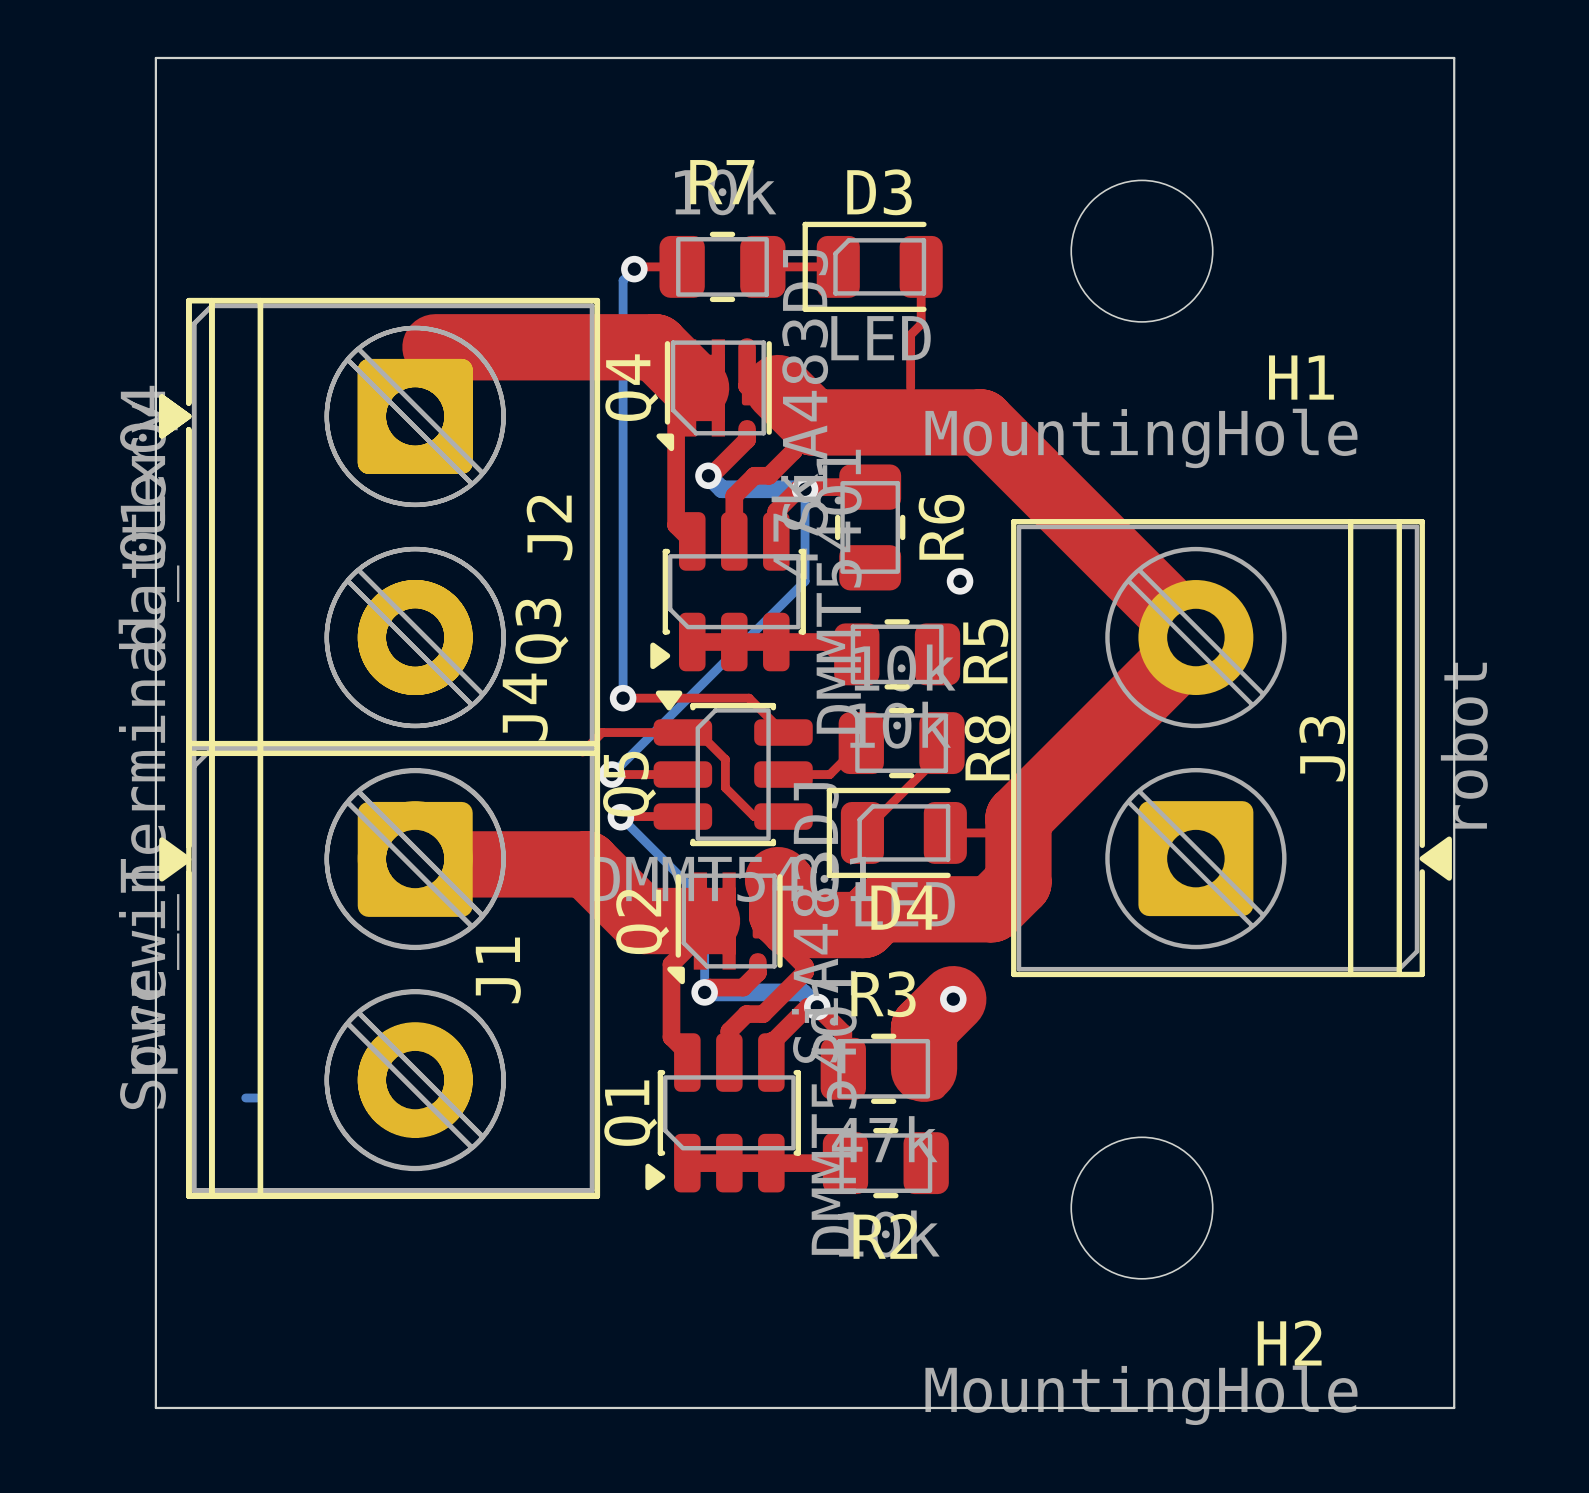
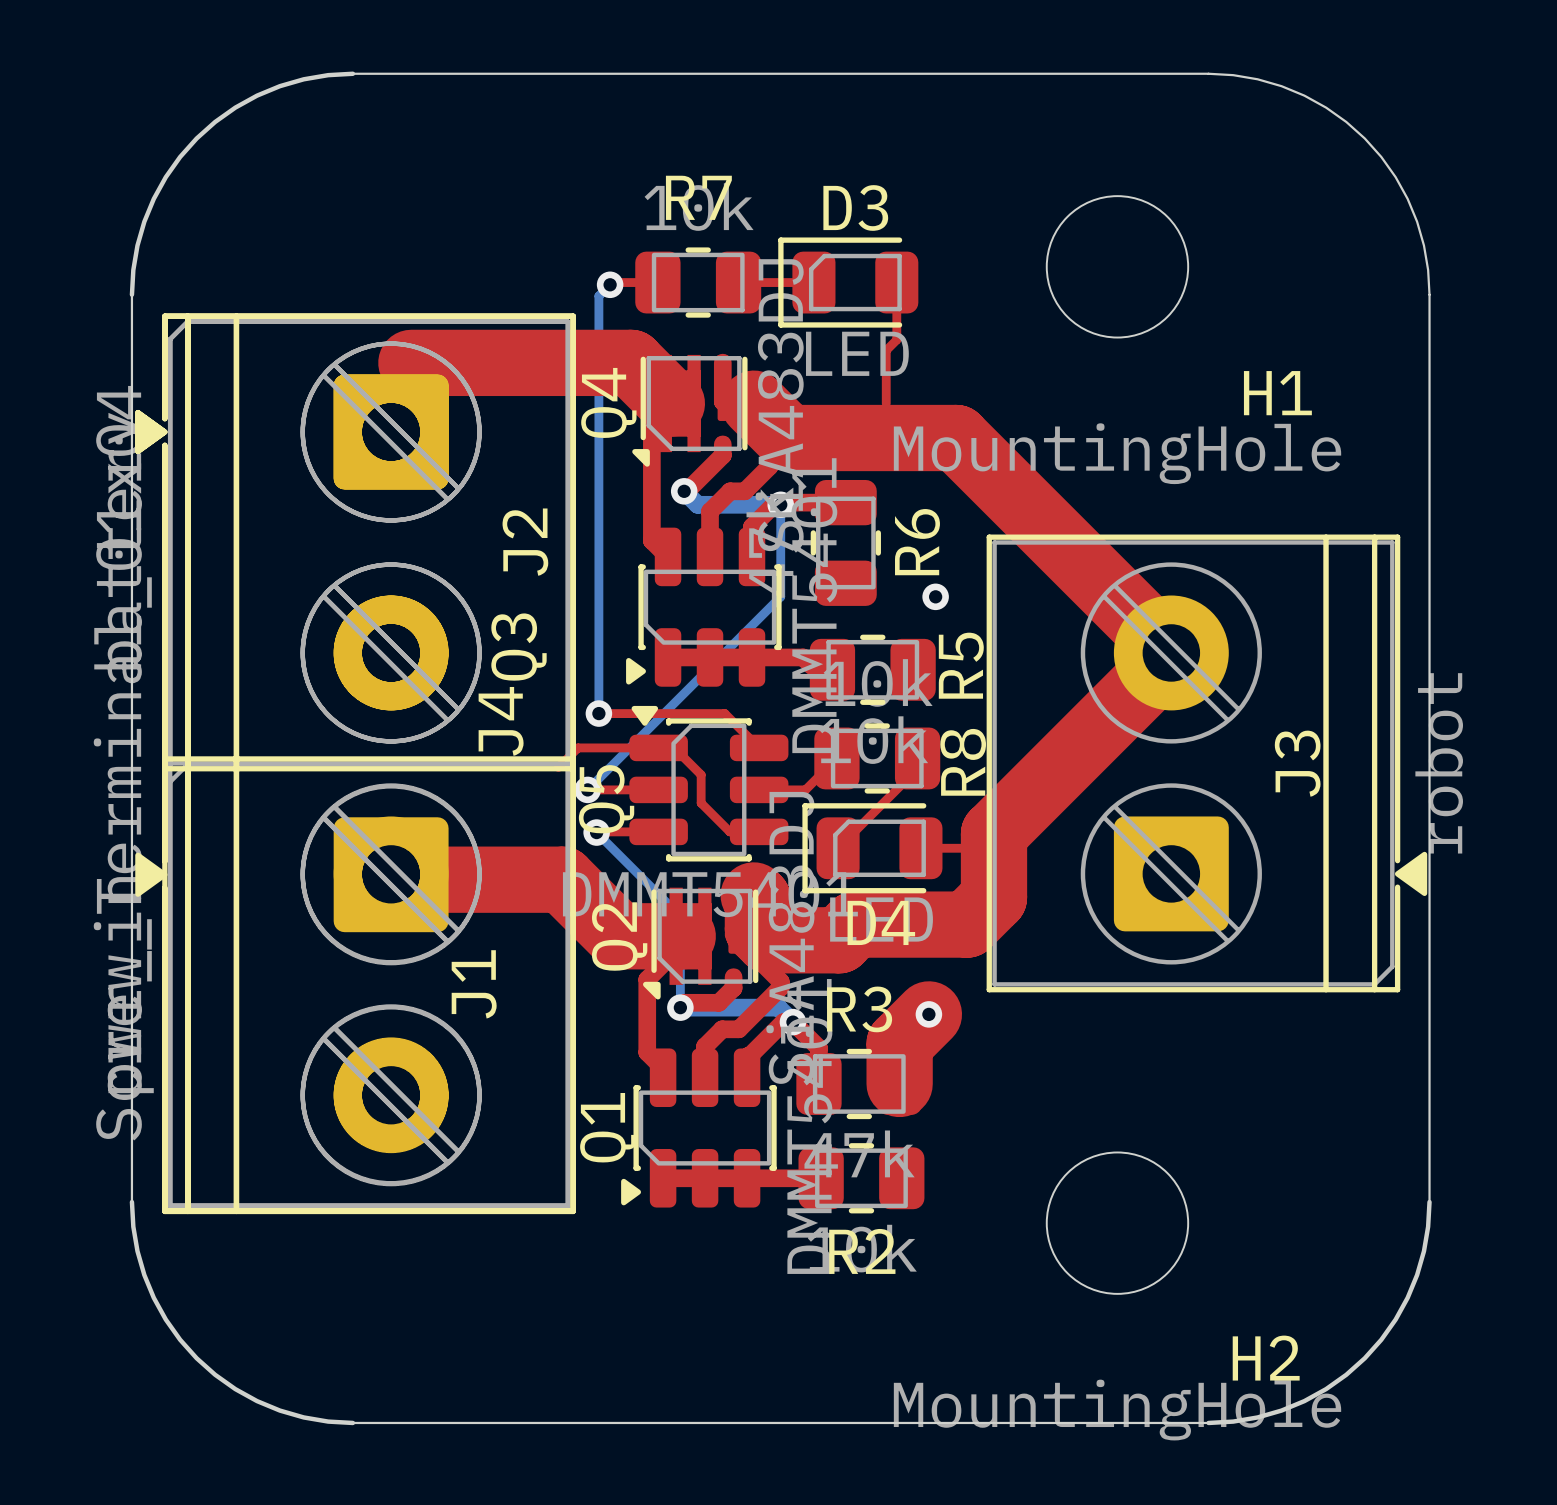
board edge: (376, 57) (155, 57) (155, 279) -> (352, 73) (303, 79) (257, 95) (215, 121) (196, 138) (165, 177) (144, 221) (133, 269) (131, 294)
board edge: (1233, 57) (1454, 57) (1454, 279) -> (1208, 73) (1257, 79) (1281, 86) (1326, 107) (1364, 138) (1381, 156) (1407, 198) (1423, 245) (1429, 294)
bottom track: (245, 1097) (256, 1097) -> none
board edge: (155, 1186) (155, 1407) (376, 1407) -> (131, 1202) (133, 1226) (144, 1274) (165, 1319) (196, 1358) (235, 1389) (279, 1410) (303, 1417) (352, 1422)
board edge: (1454, 1186) (1454, 1407) (1233, 1407) -> (1429, 1202) (1423, 1251) (1407, 1297) (1381, 1339) (1364, 1358) (1326, 1389) (1281, 1410) (1233, 1421) (1208, 1422)

